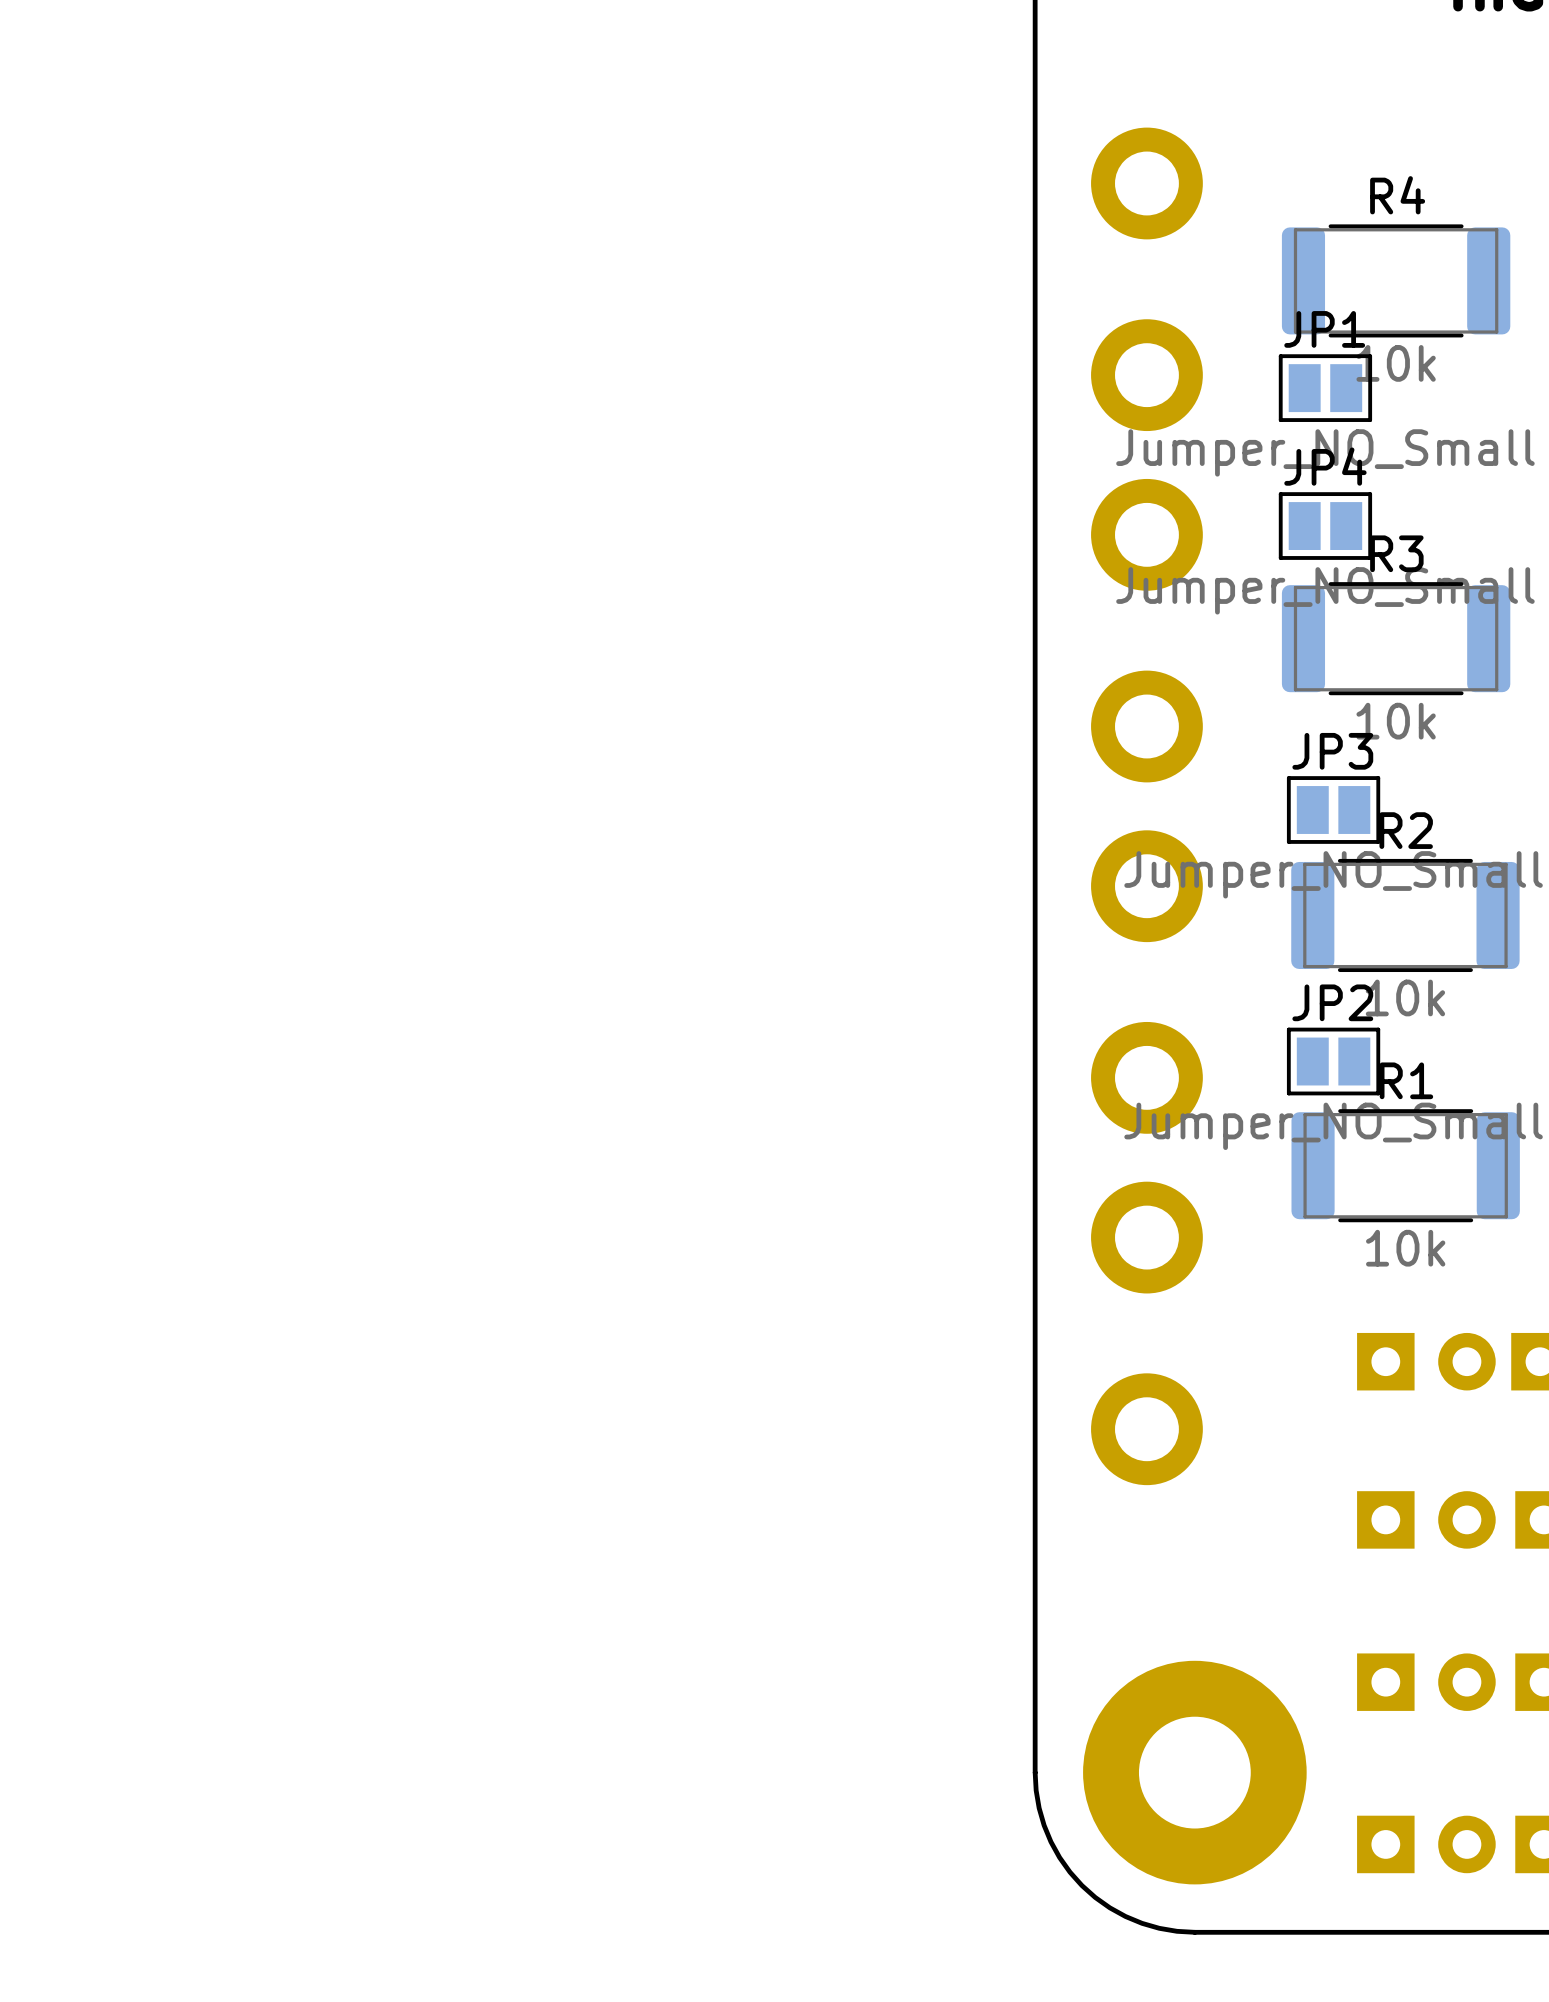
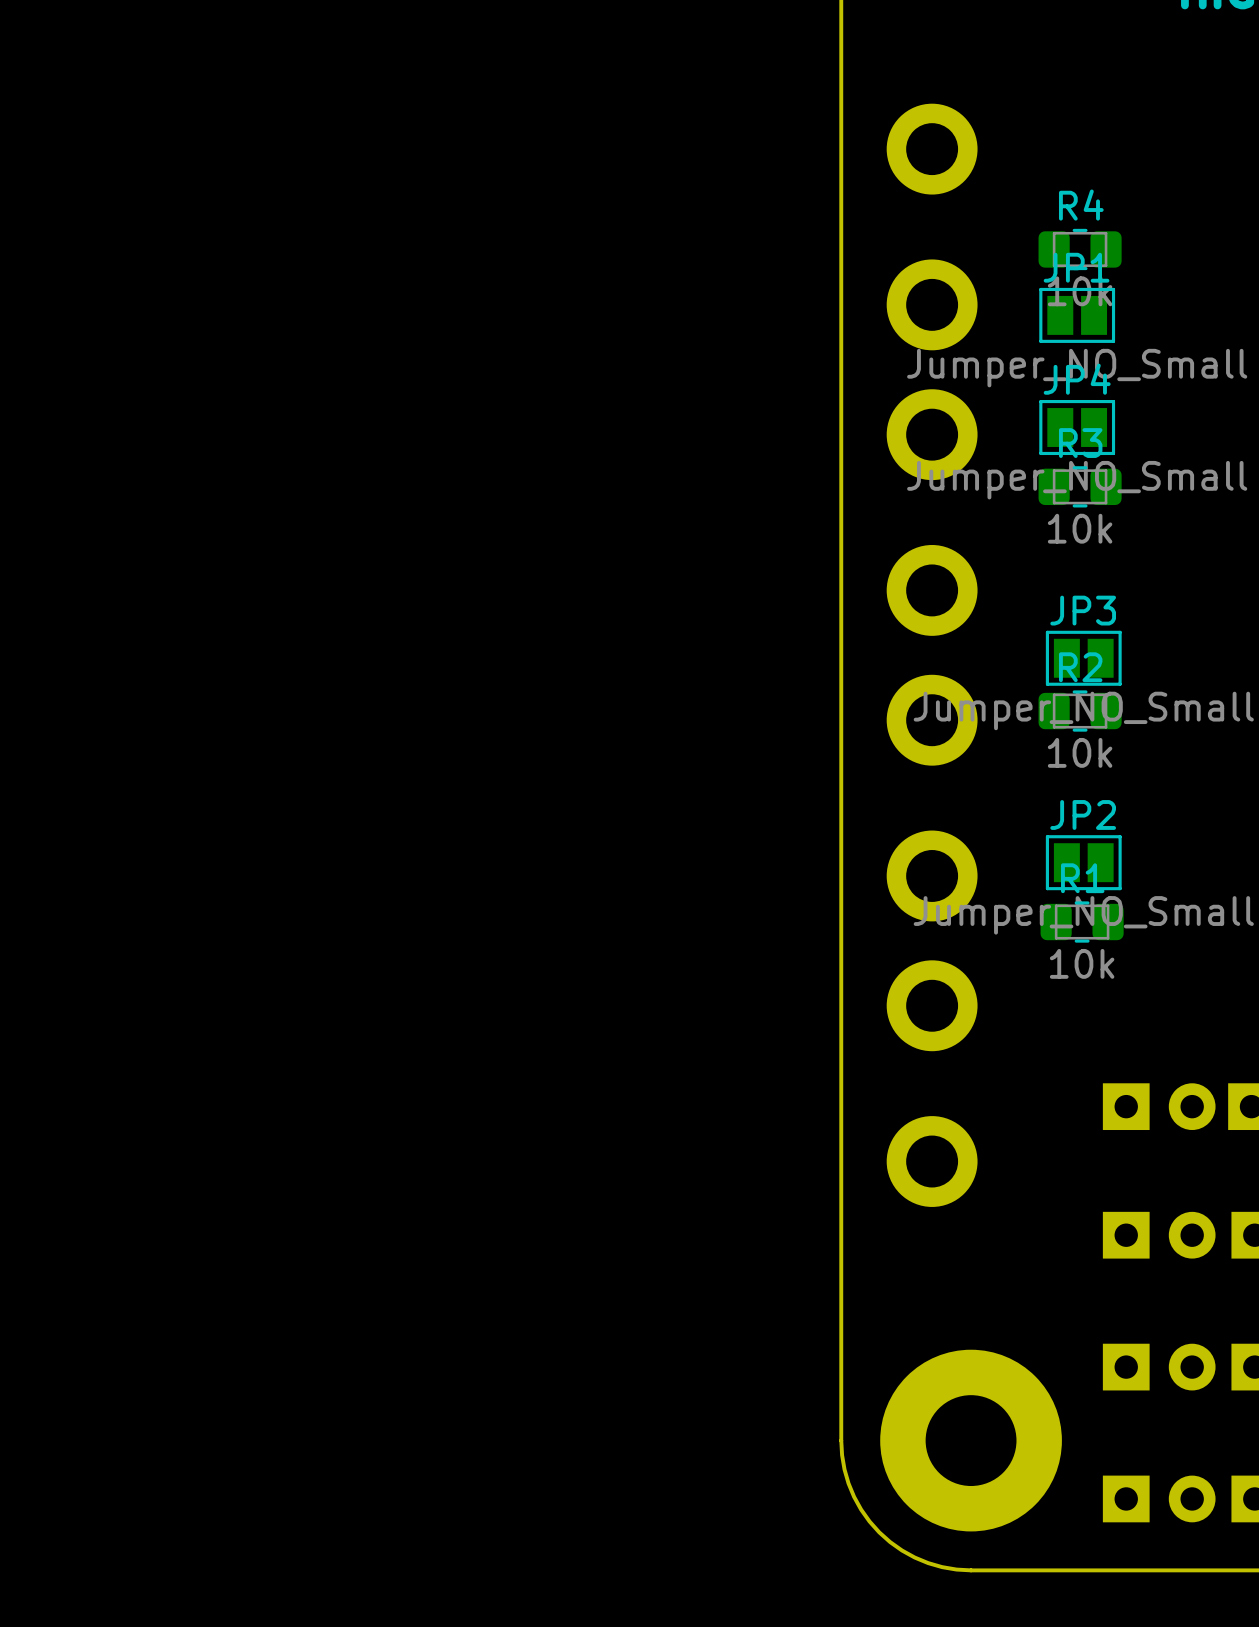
R4 footprint: [1281, 224, 1511, 338] -> [1038, 228, 1122, 271]
R3 footprint: [1281, 582, 1511, 696] -> [1038, 466, 1122, 508]
R2 footprint: [1291, 858, 1520, 973] -> [1038, 690, 1122, 732]
R1 footprint: [1291, 1109, 1520, 1223] -> [1040, 901, 1124, 943]

